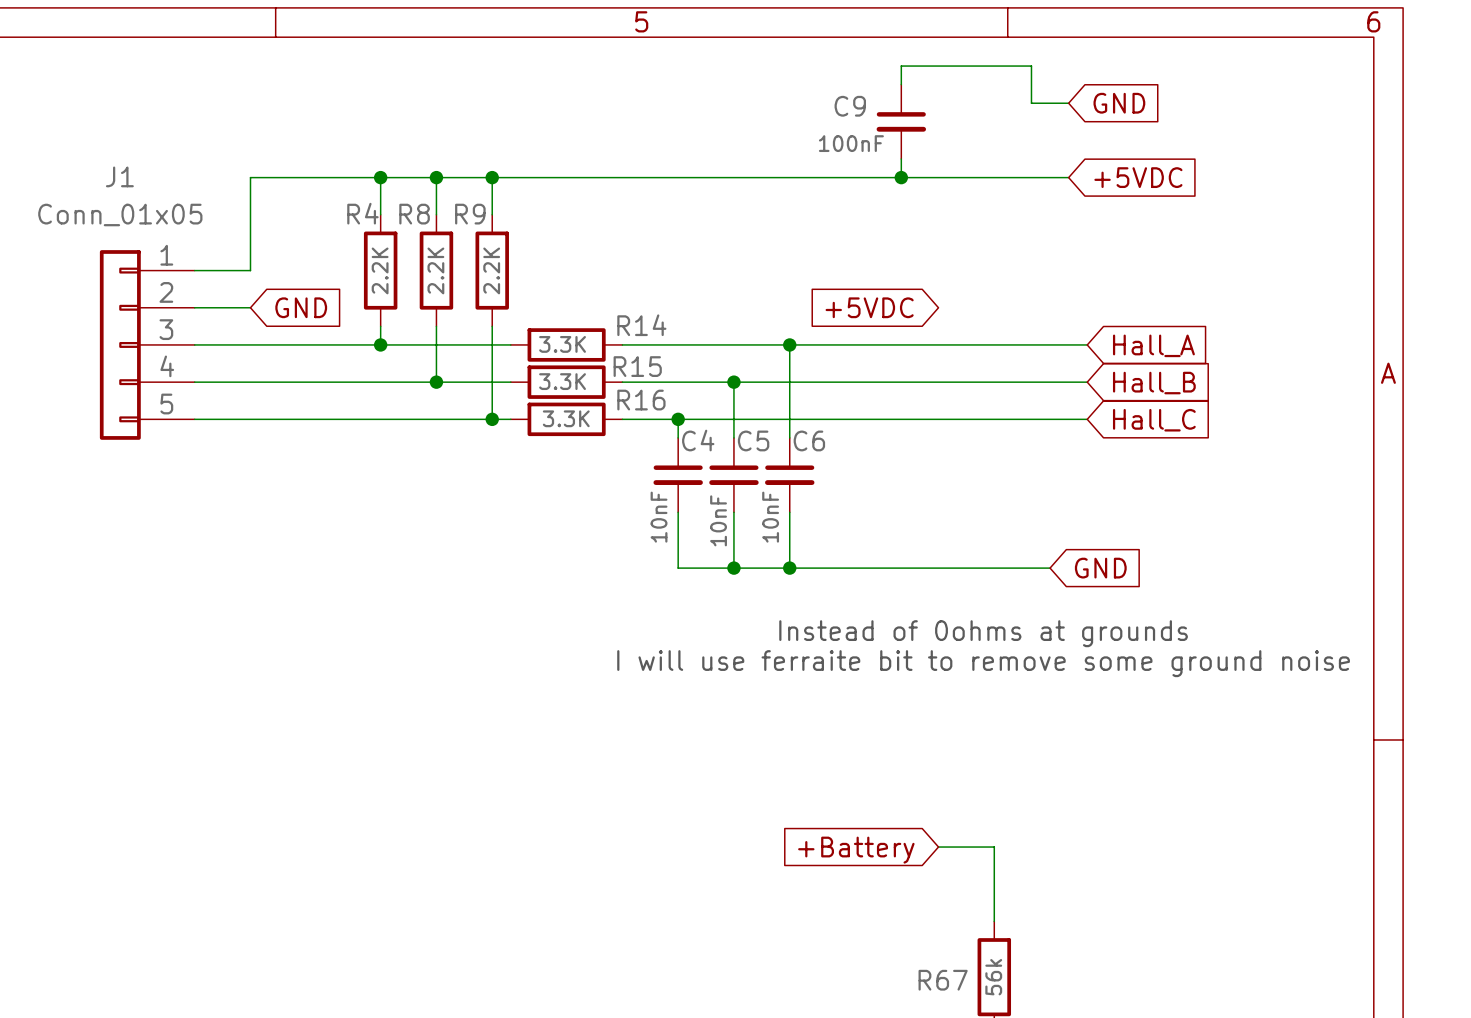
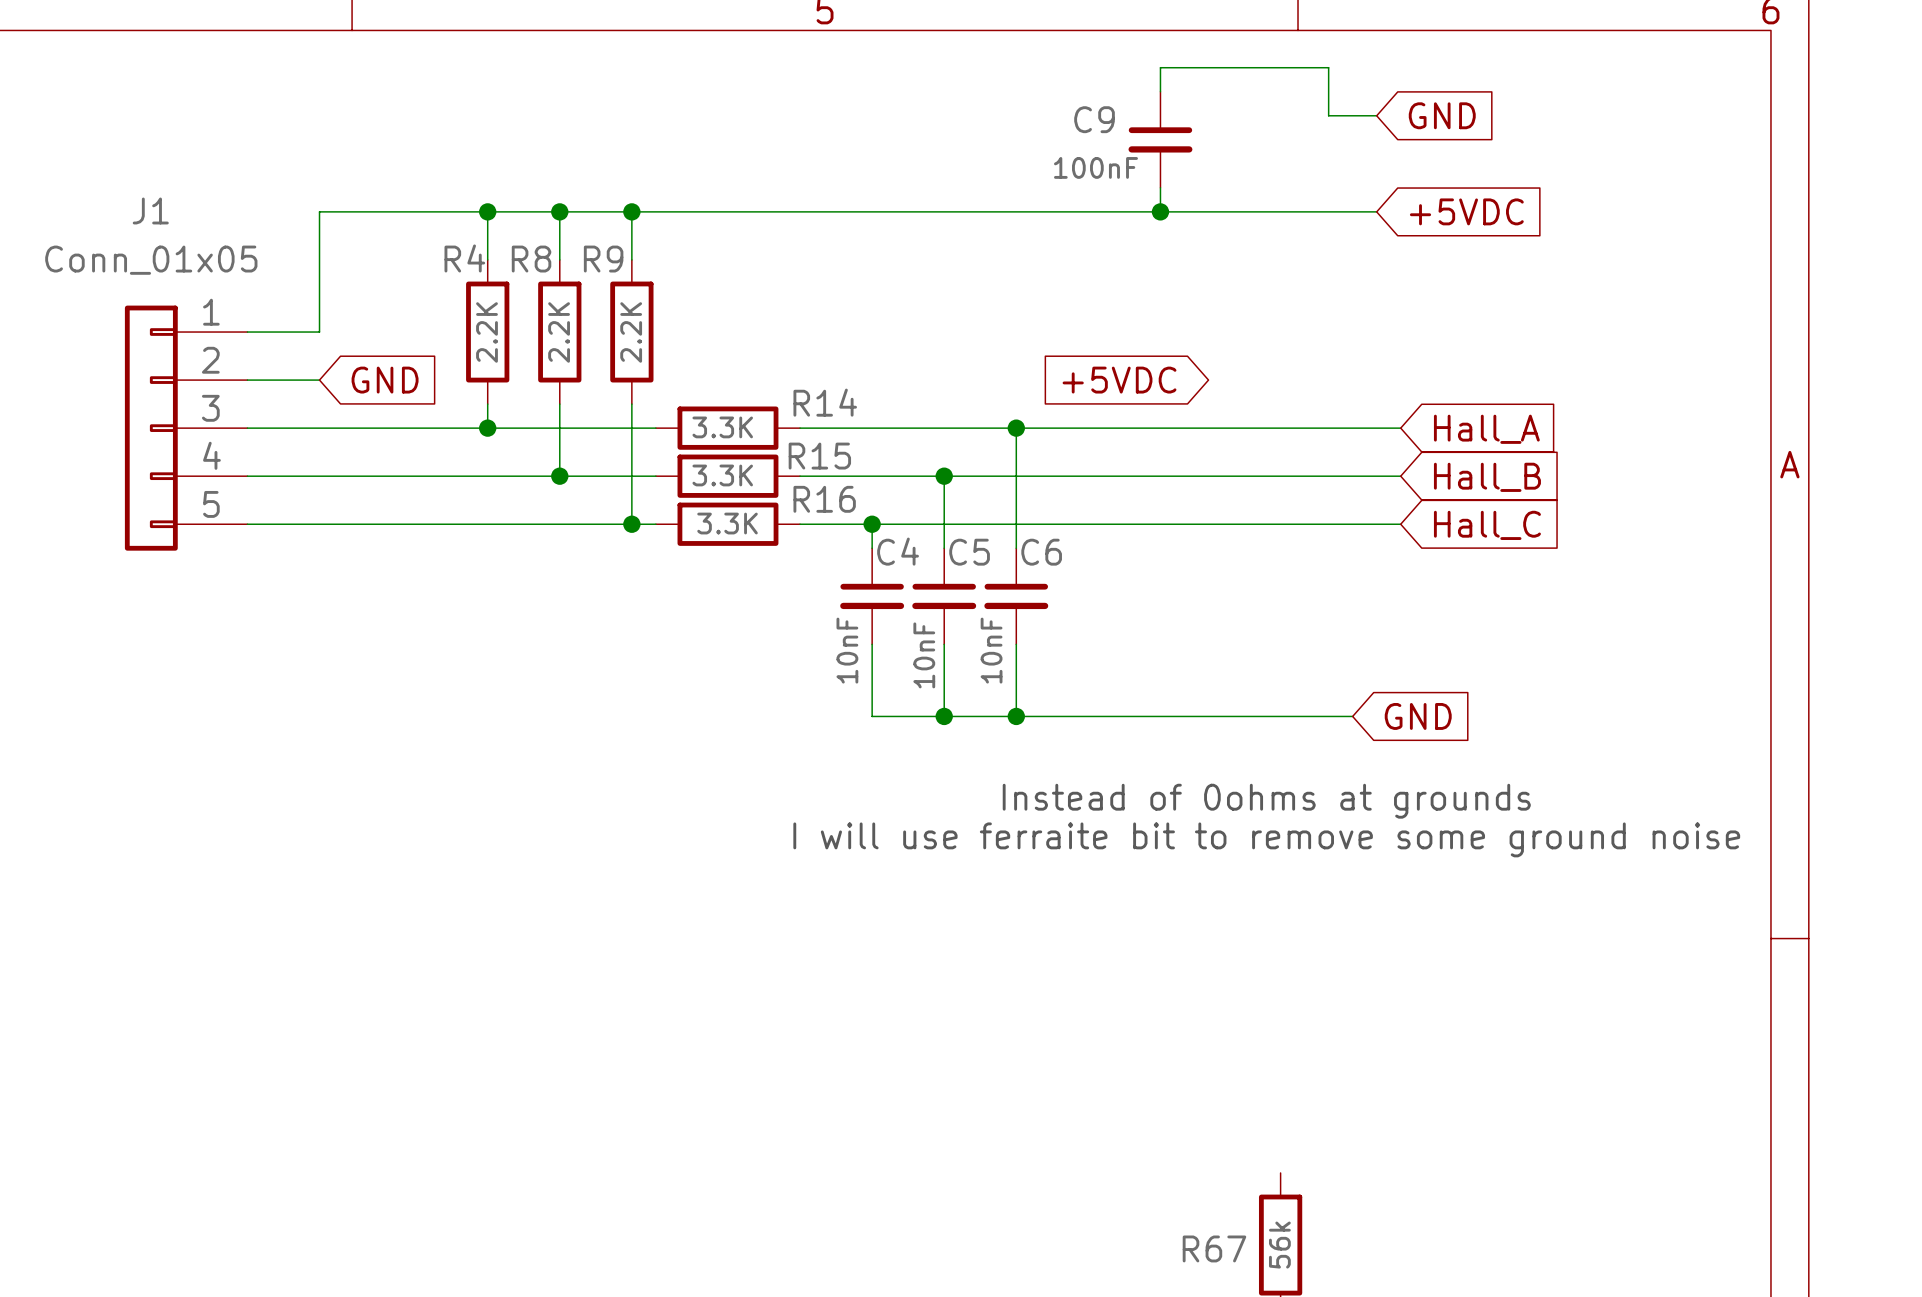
wire: (938, 847) (994, 847) (994, 921) -> none
global label: +Battery (856, 850) -> none

